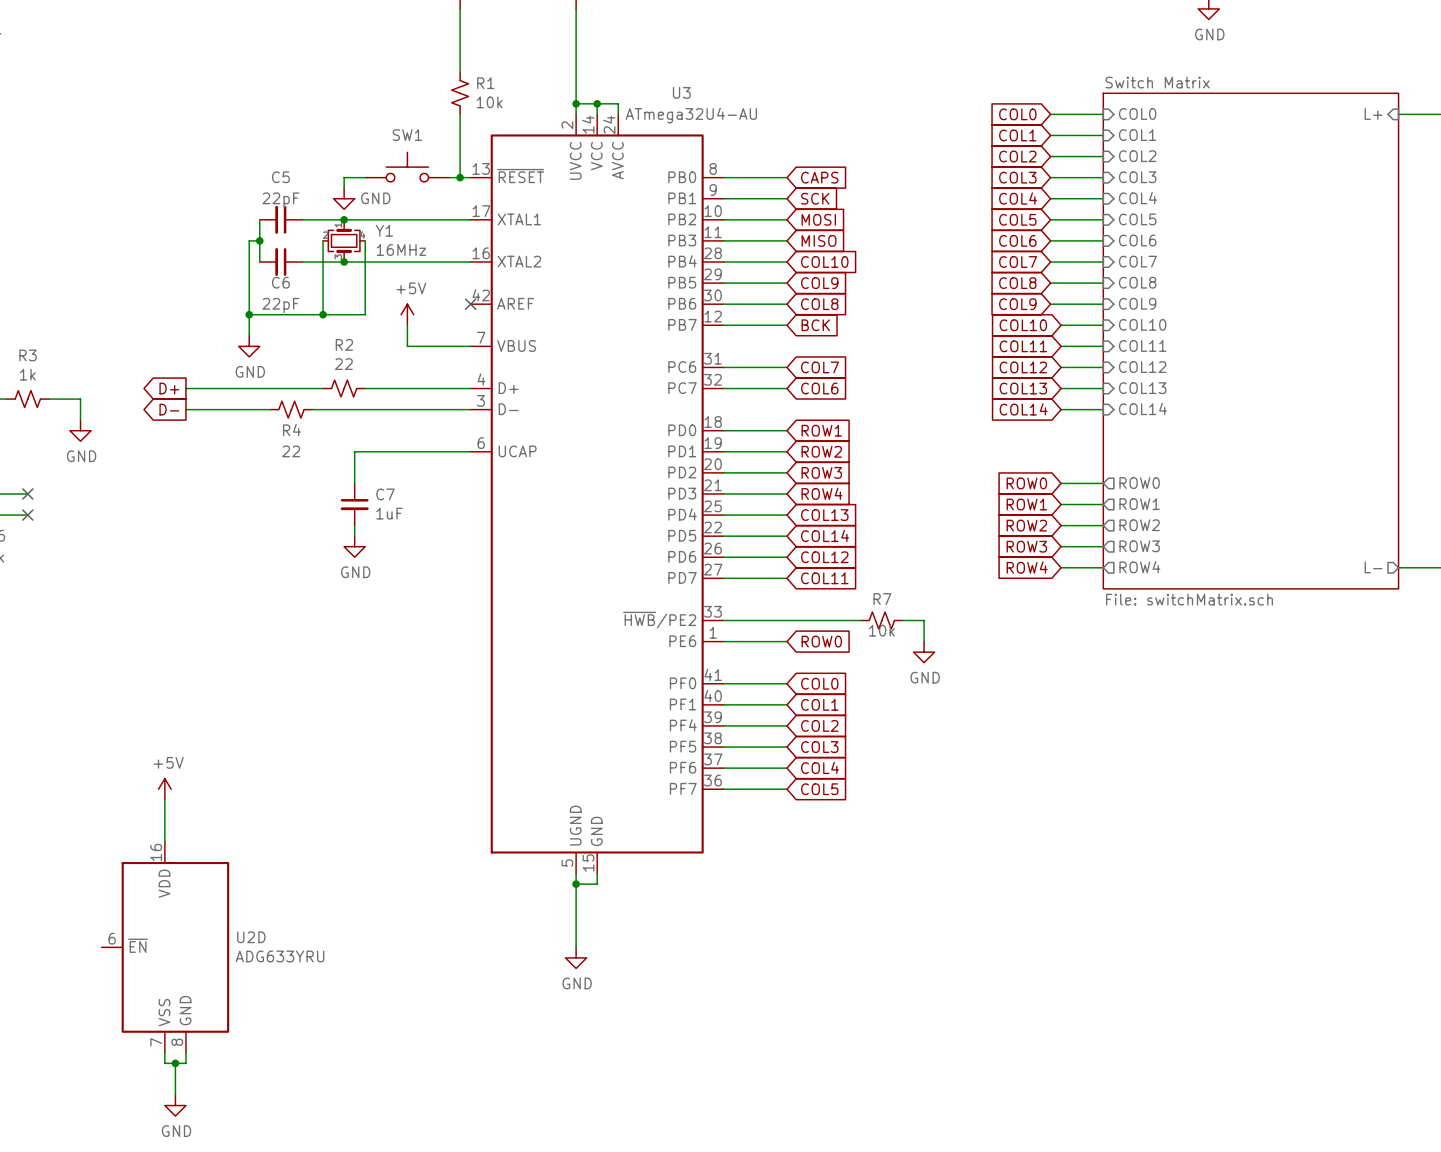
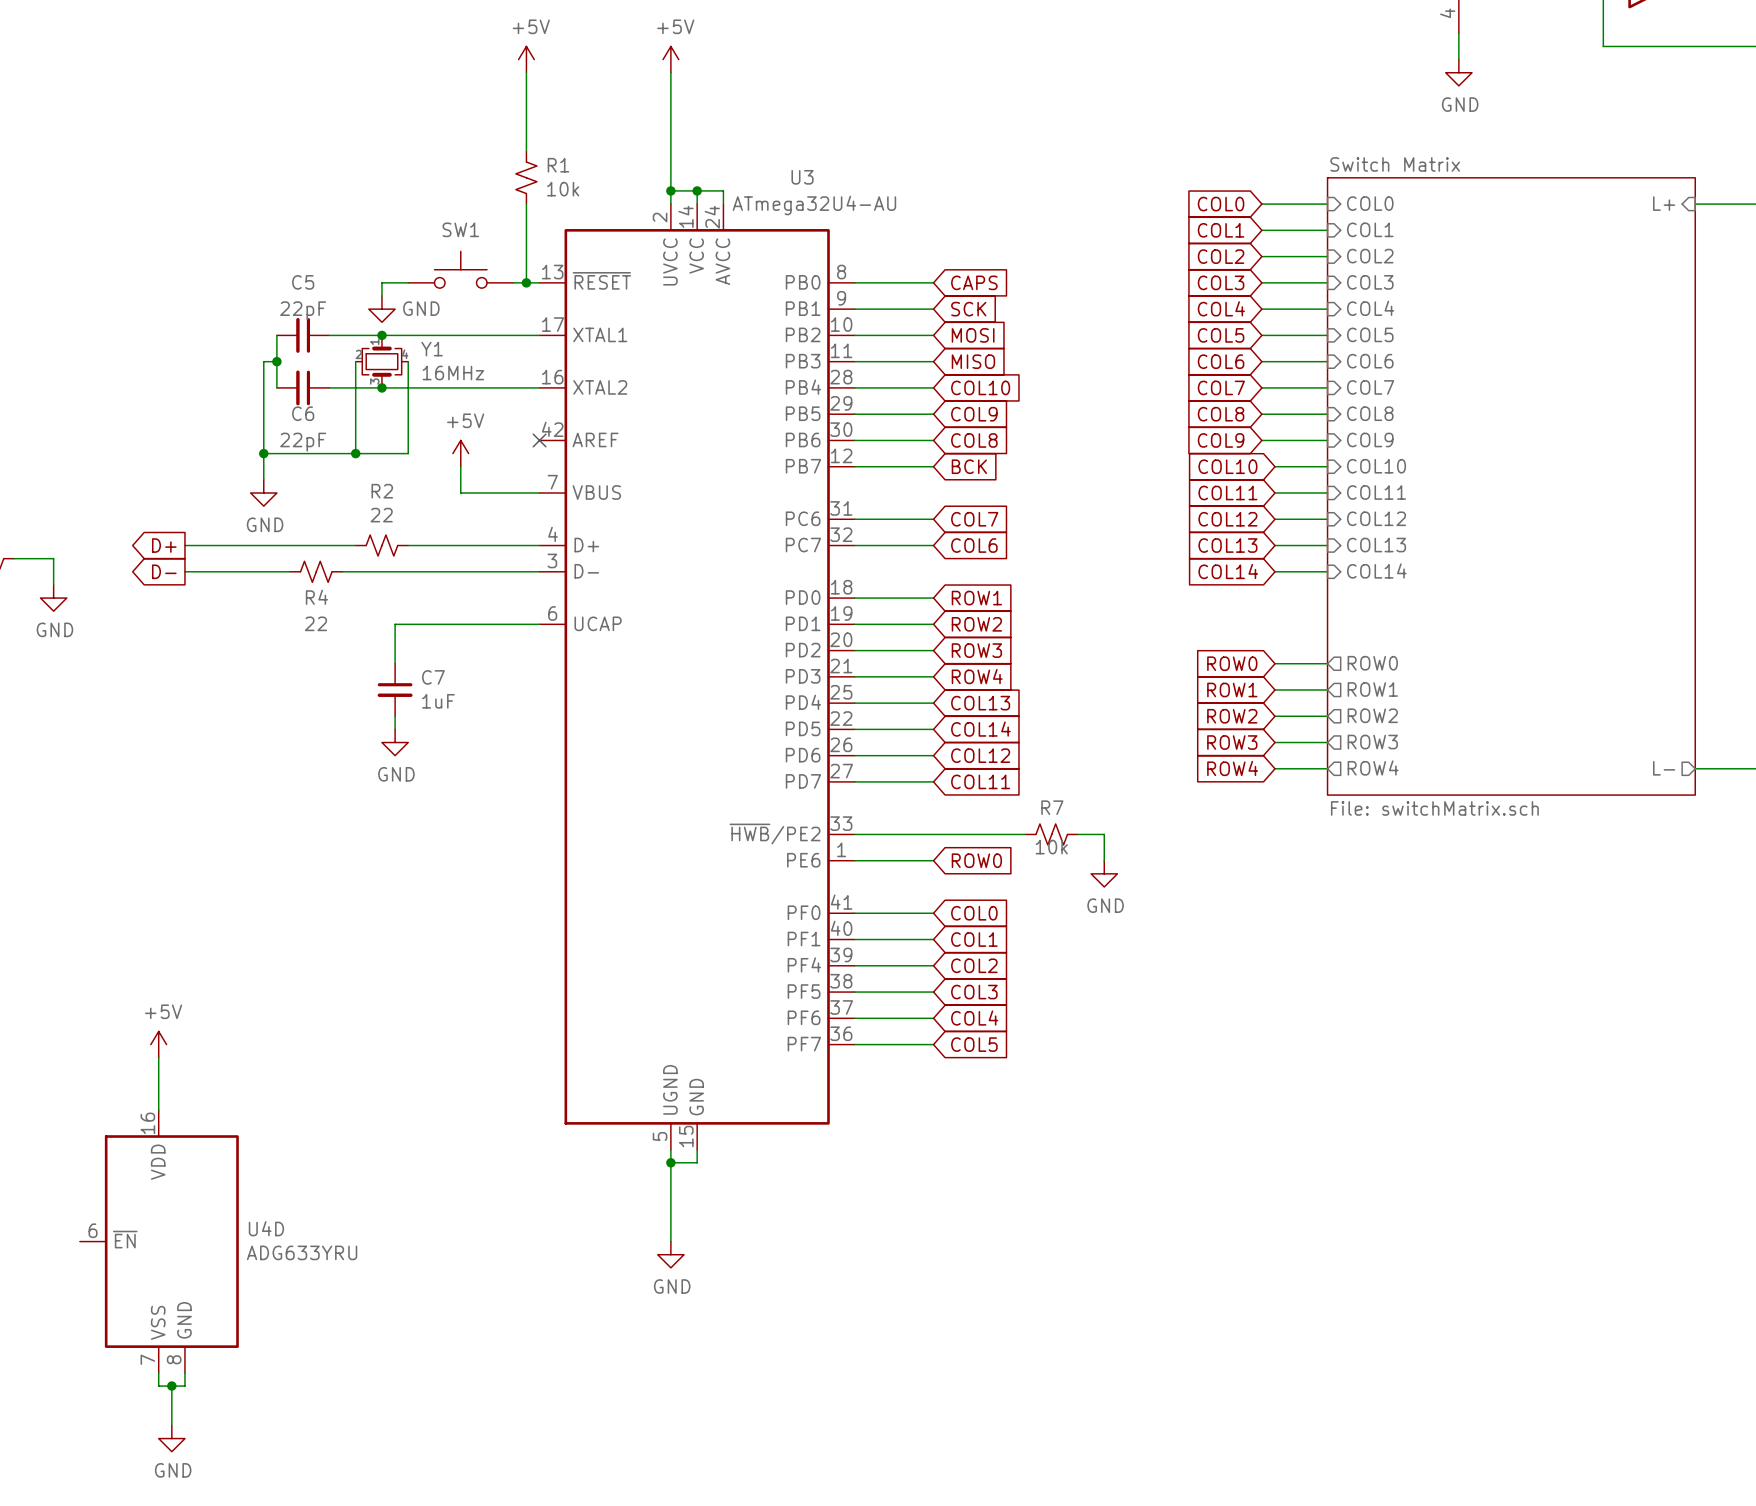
U2D name: U2D (251, 937) -> U4D (266, 1228)

